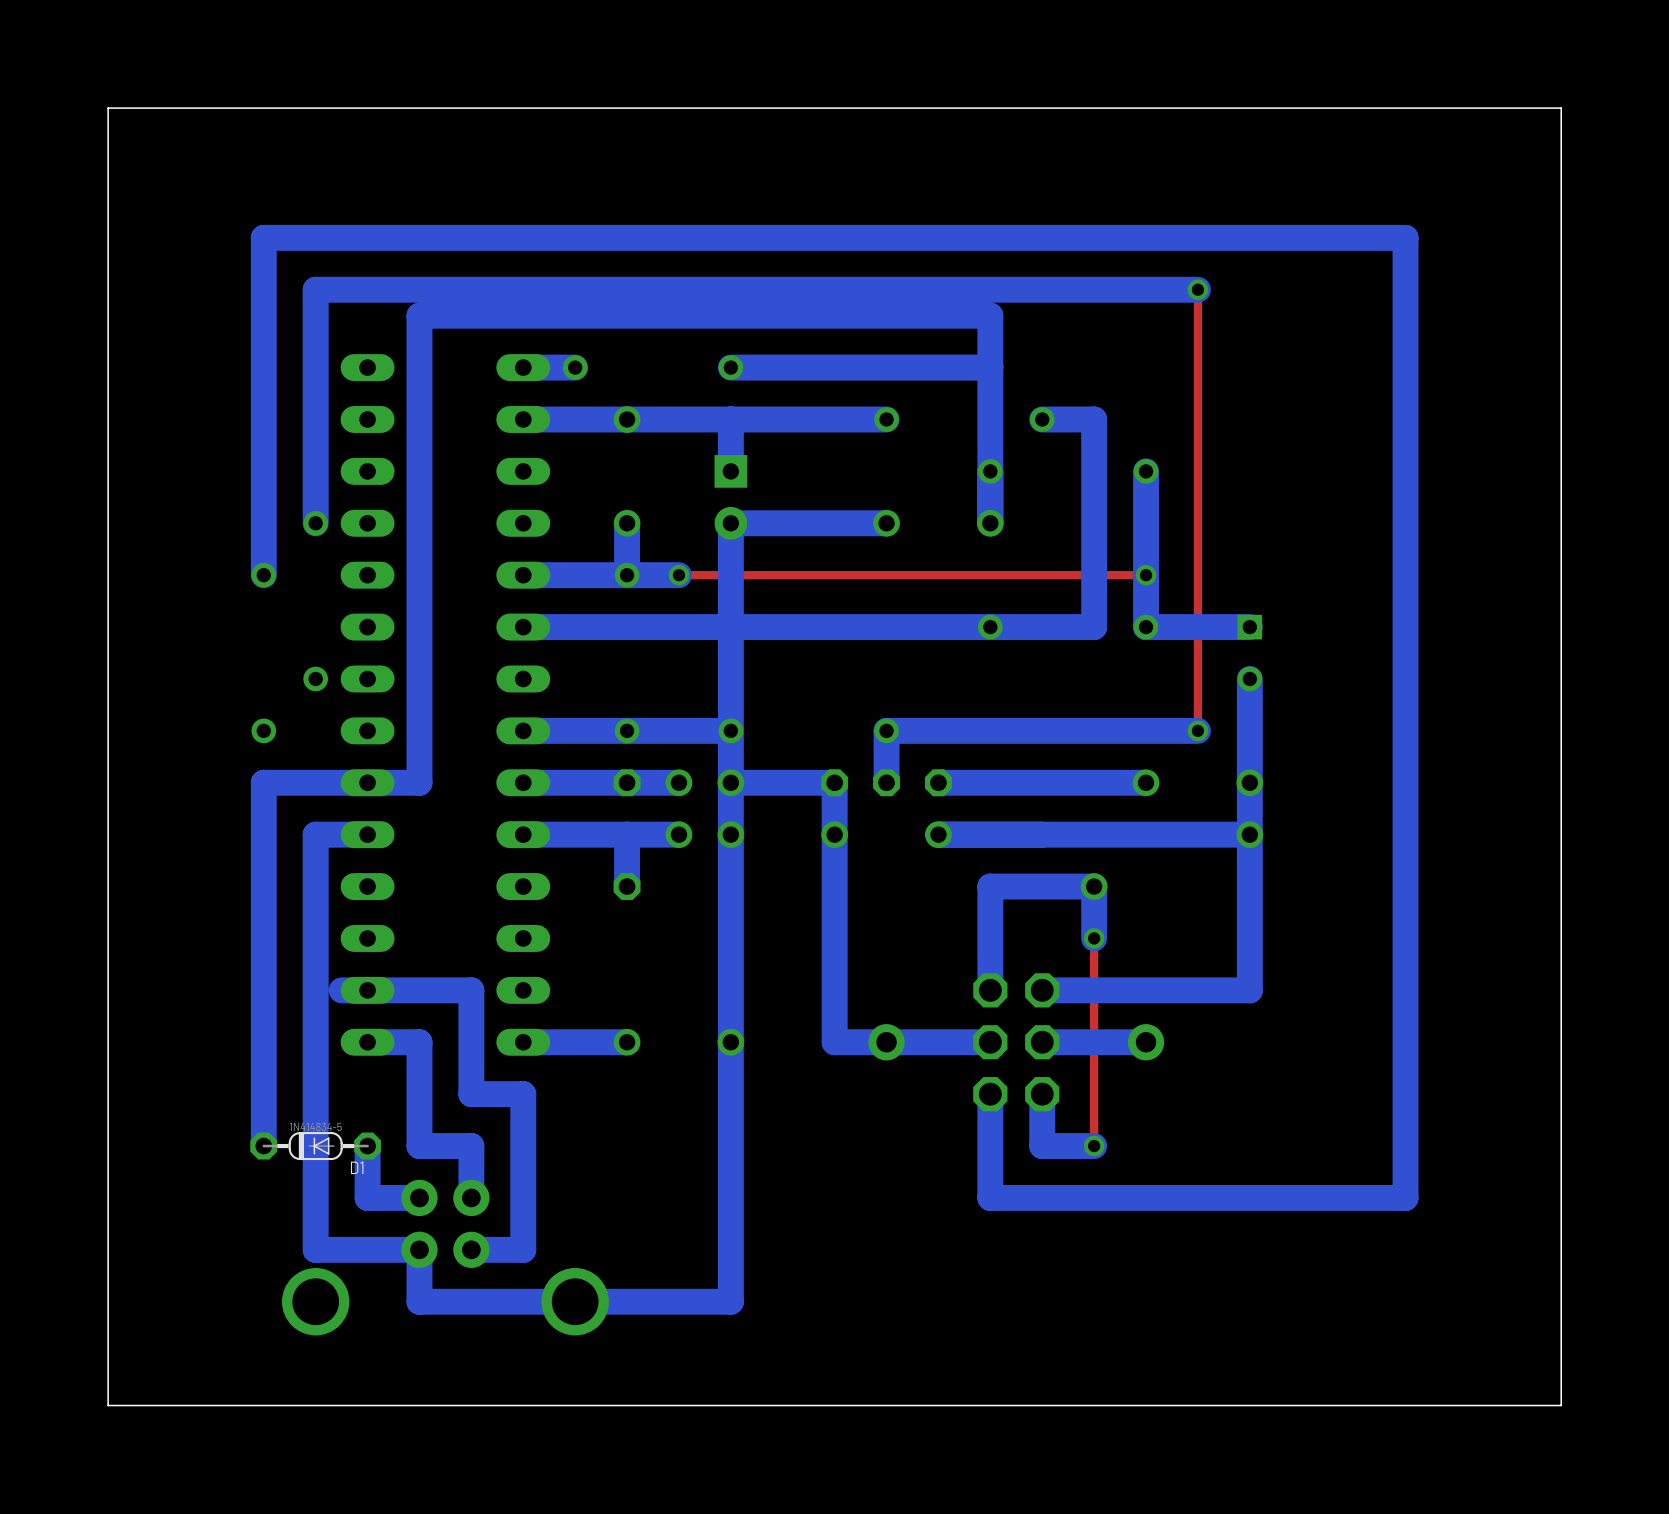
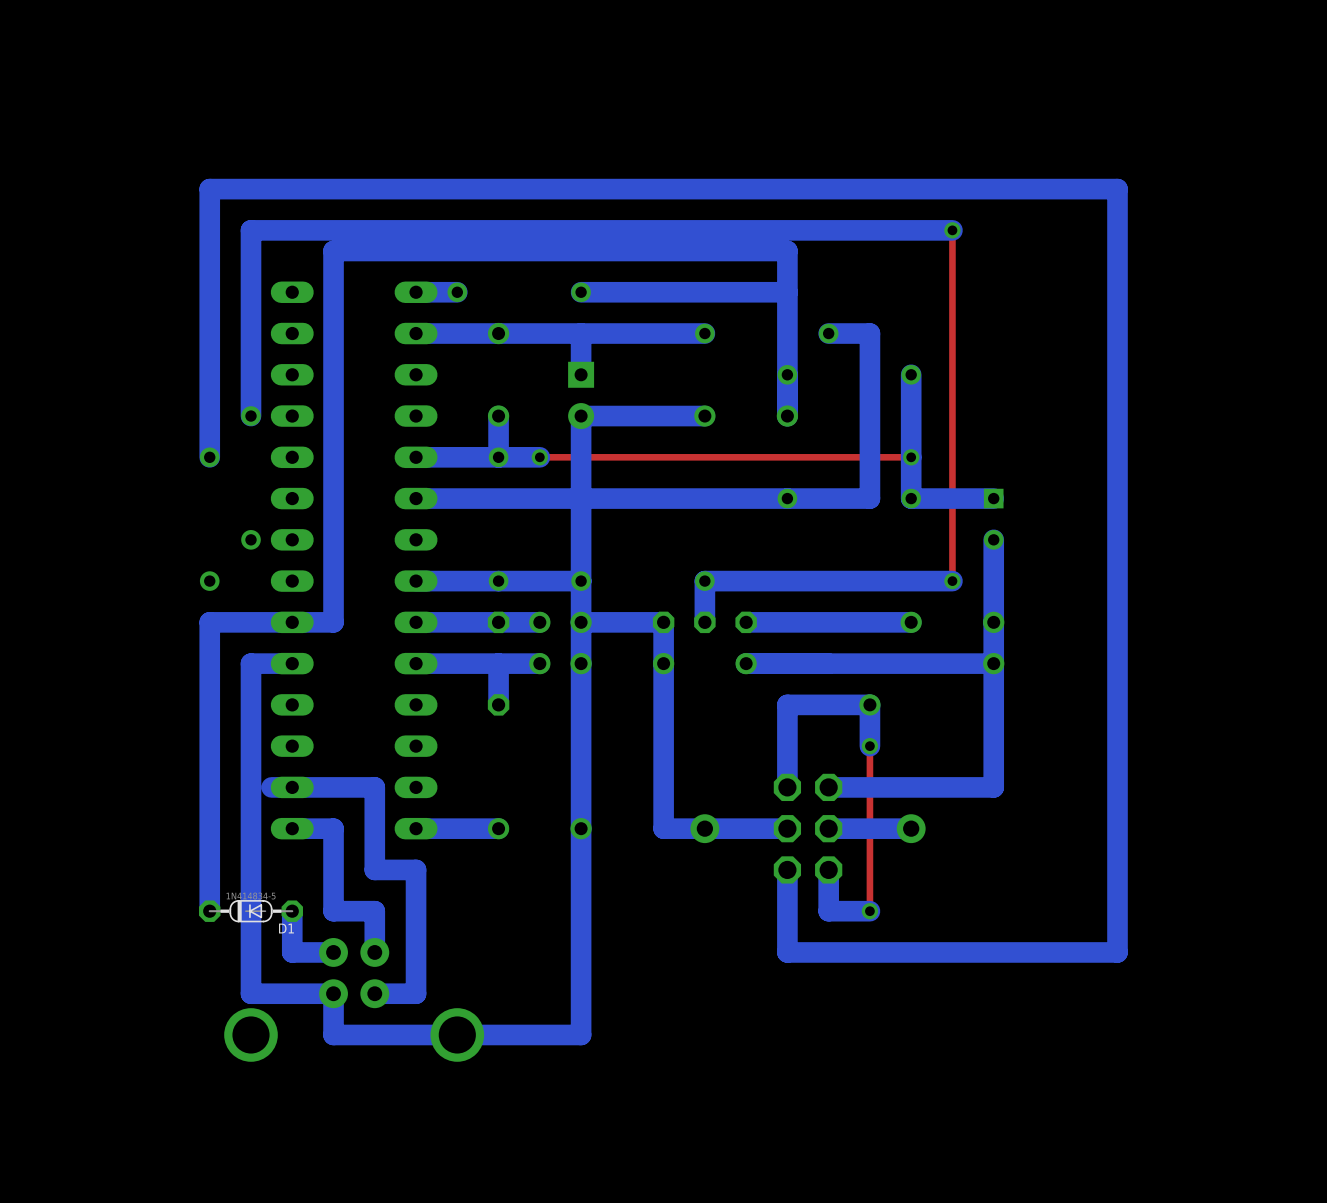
board edge: (1561, 108) (108, 108) (108, 1405) (1561, 1405) (1561, 108) -> none

